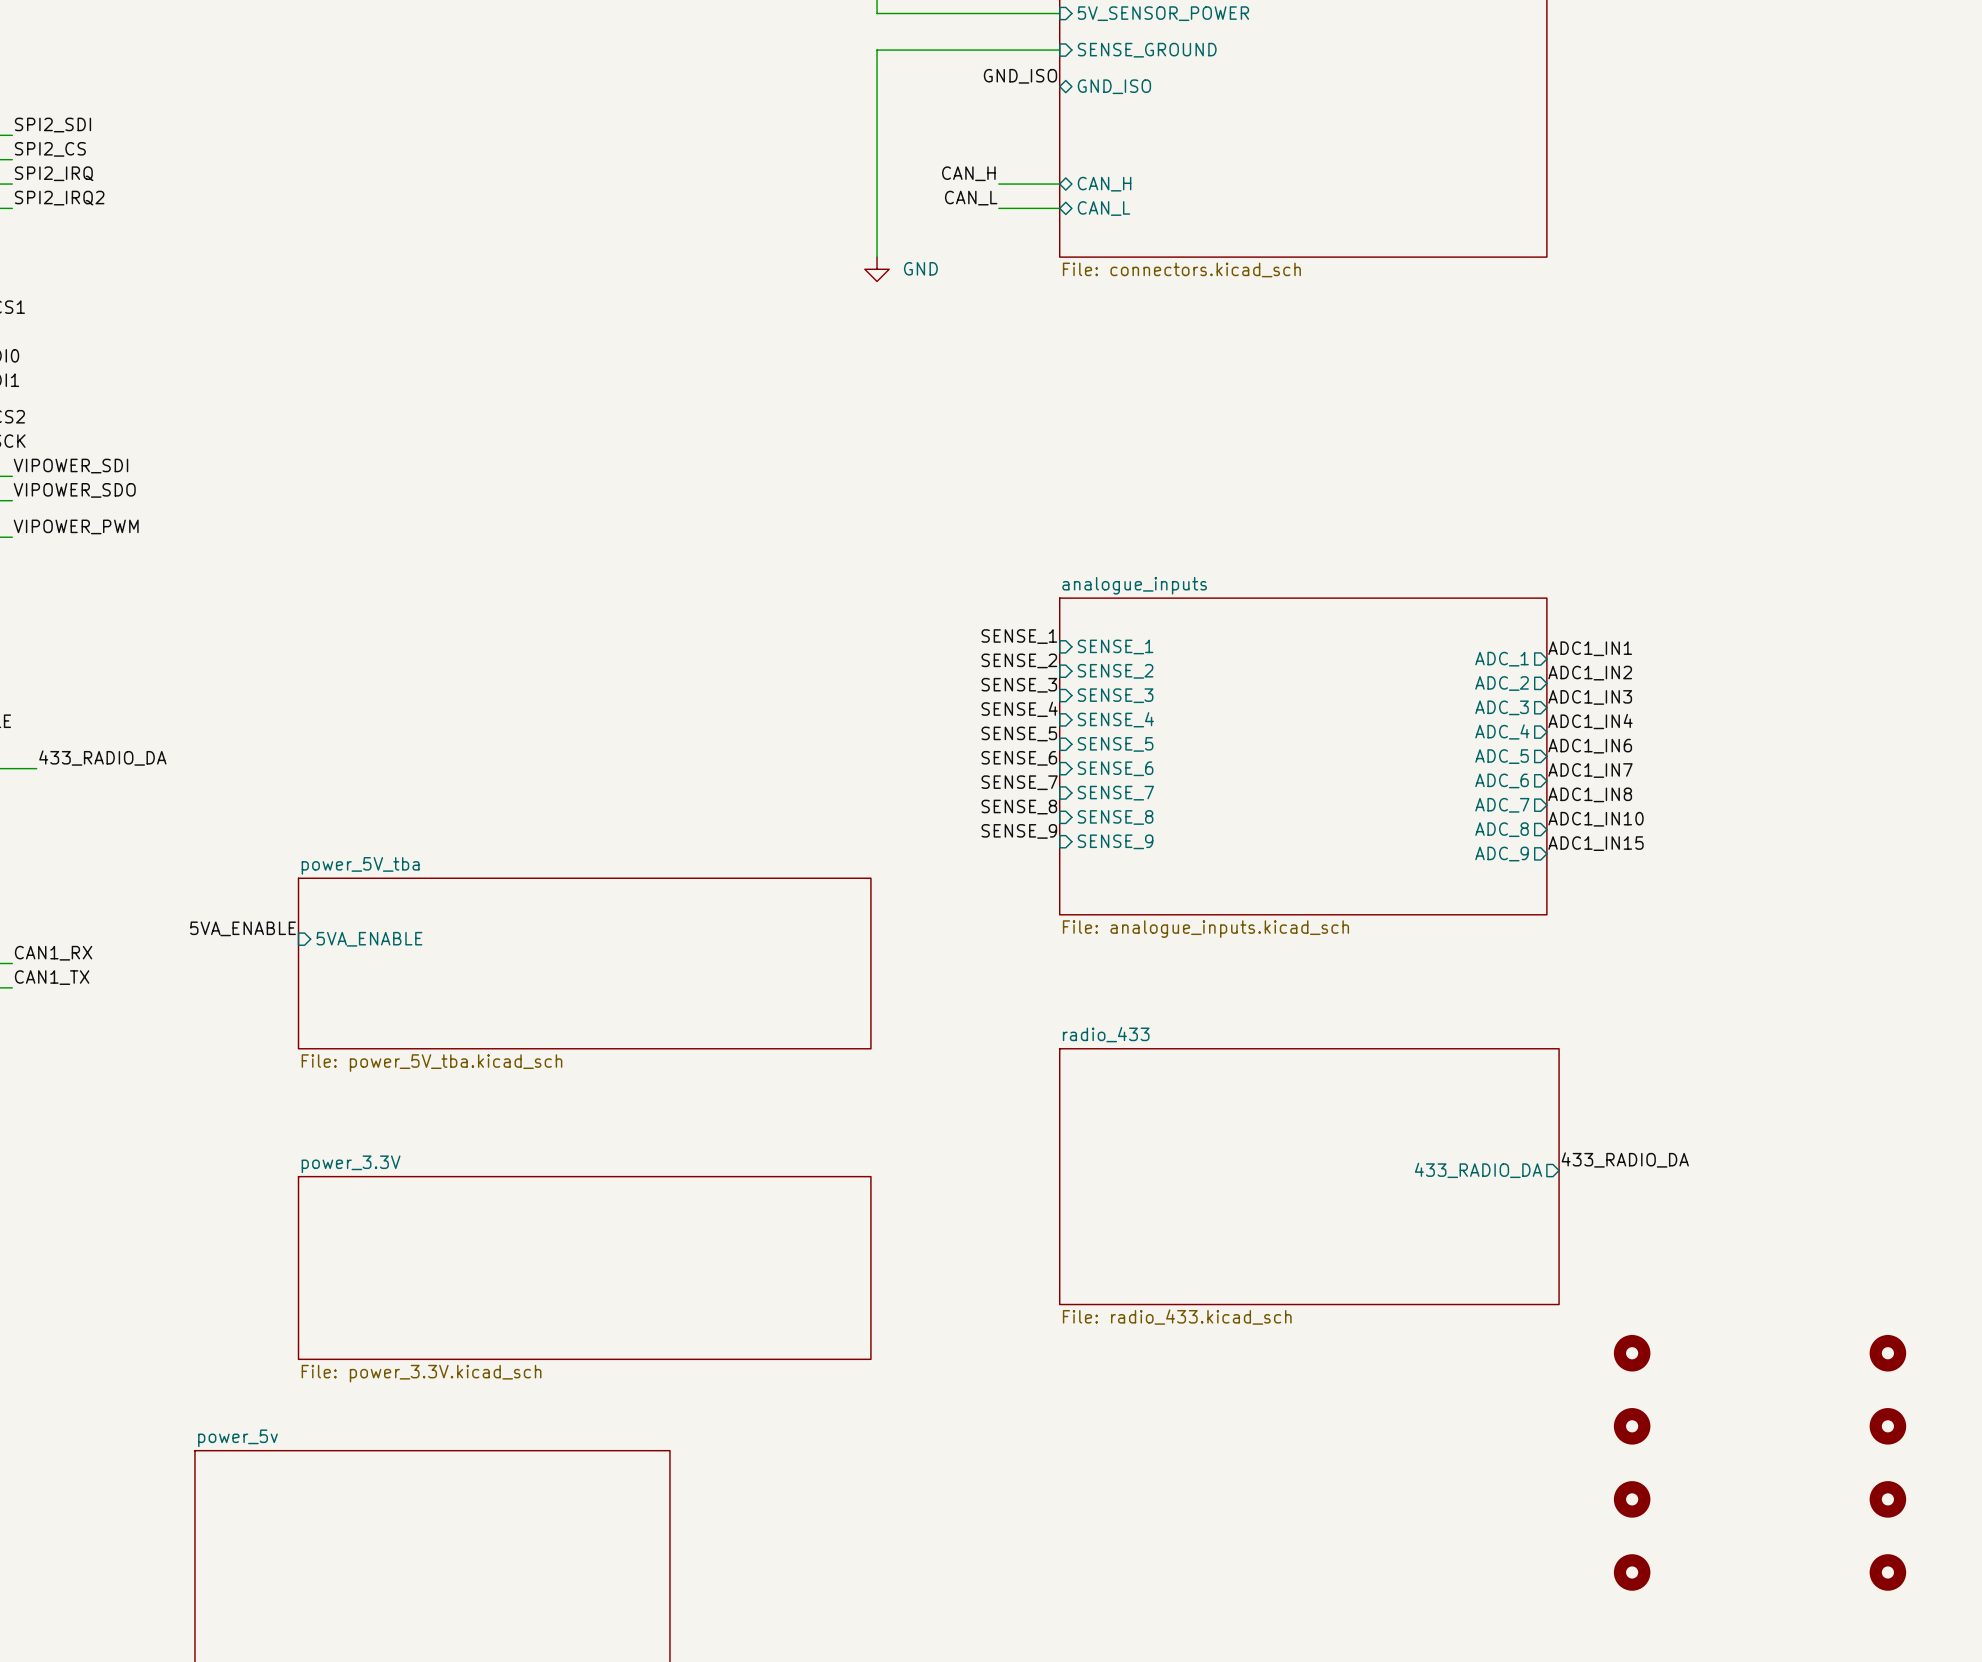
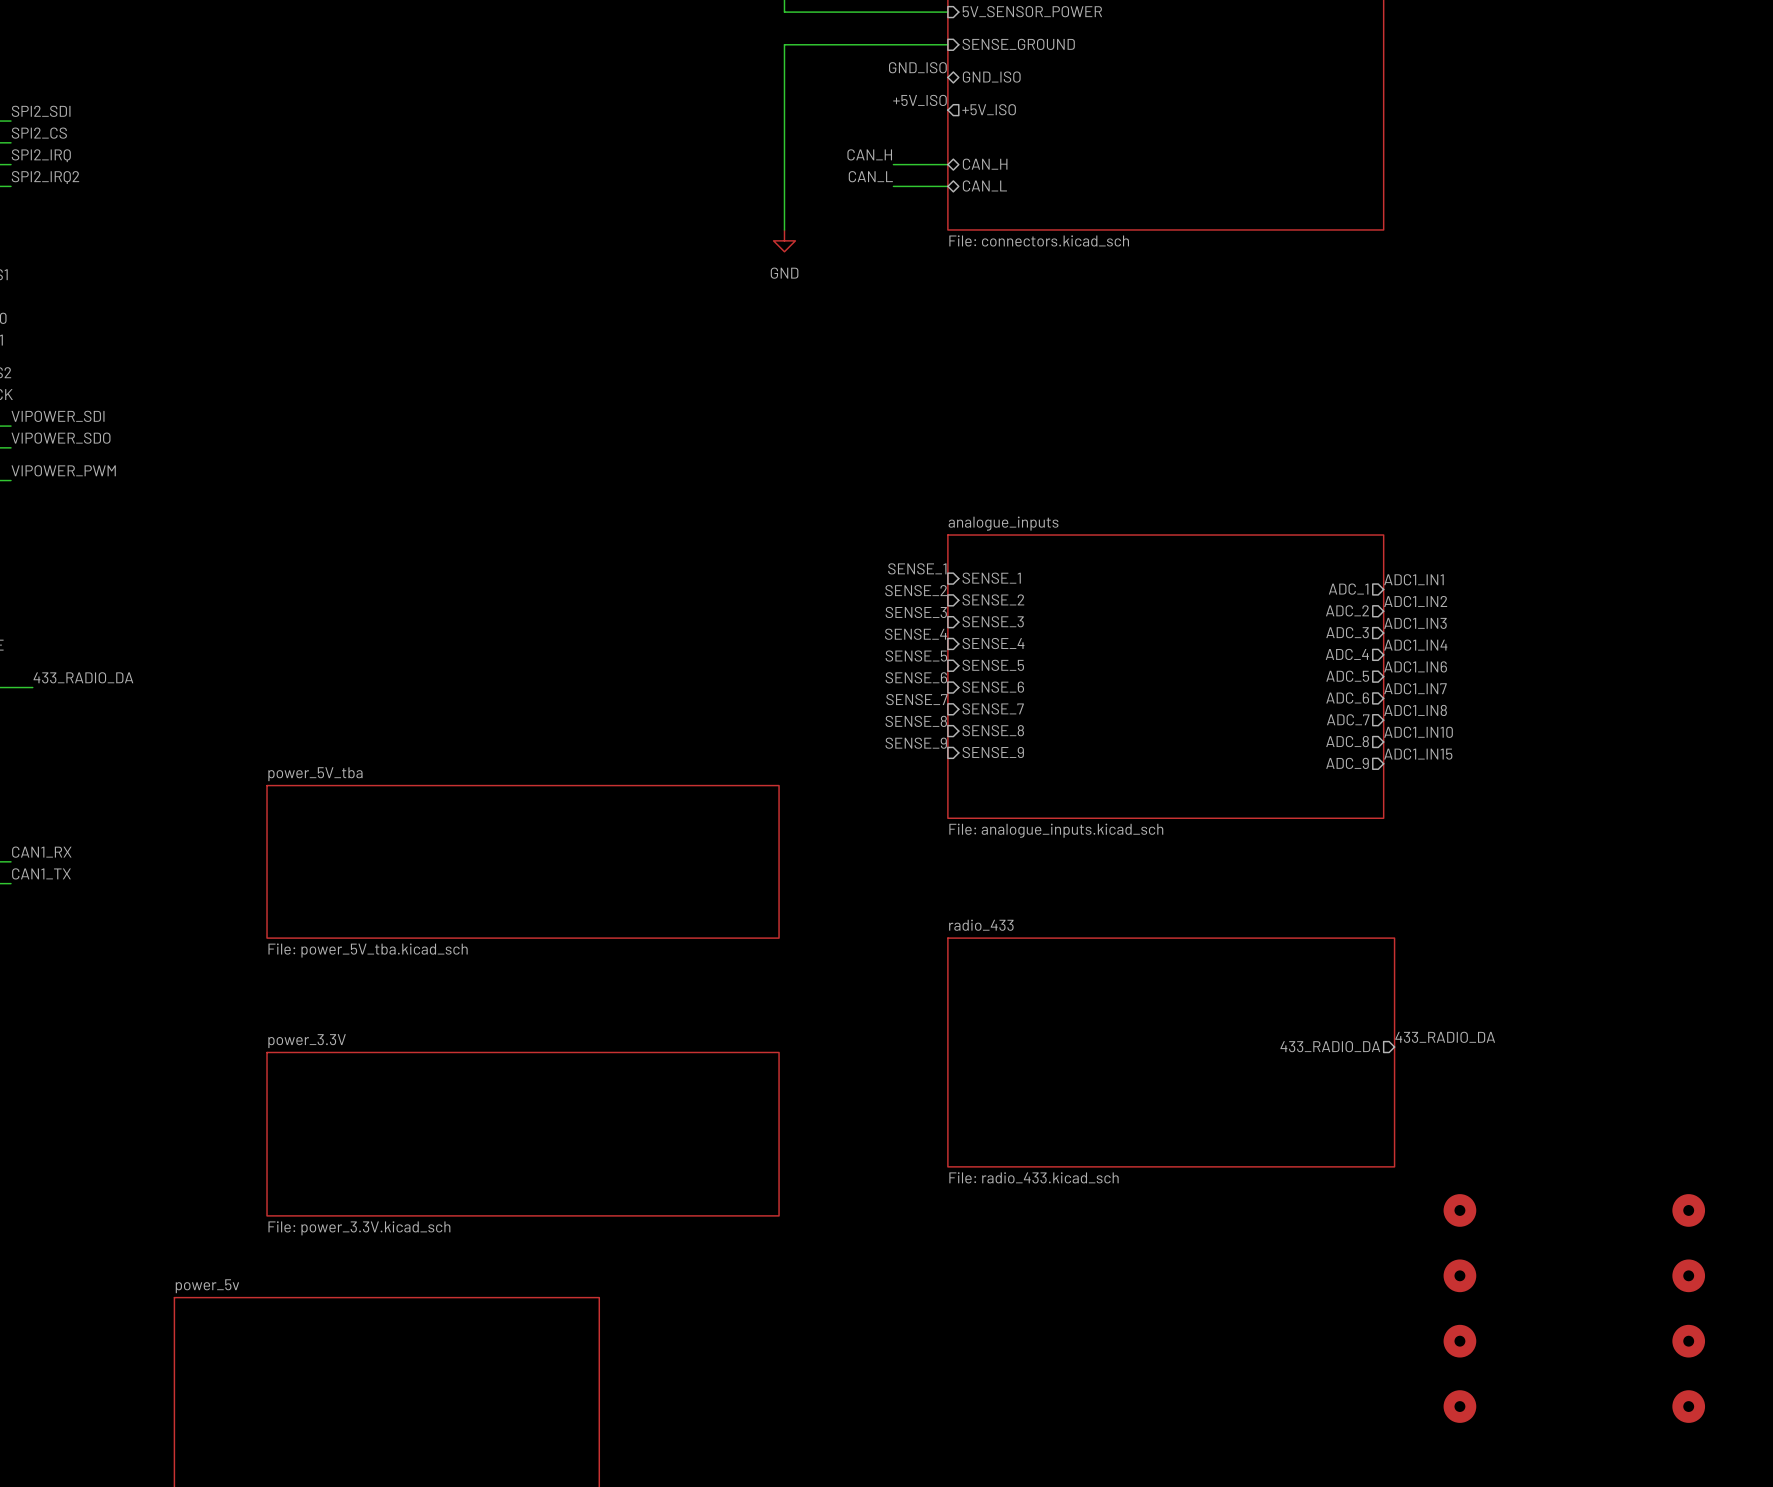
label: none -> +5V_ISO (919, 100)
sheet pin: none -> +5V_ISO (989, 109)
power symbol text position: GND (920, 268) -> GND (784, 273)
label: 5VA_ENABLE (243, 928) -> none
sheet pin: 5VA_ENABLE (369, 939) -> none

